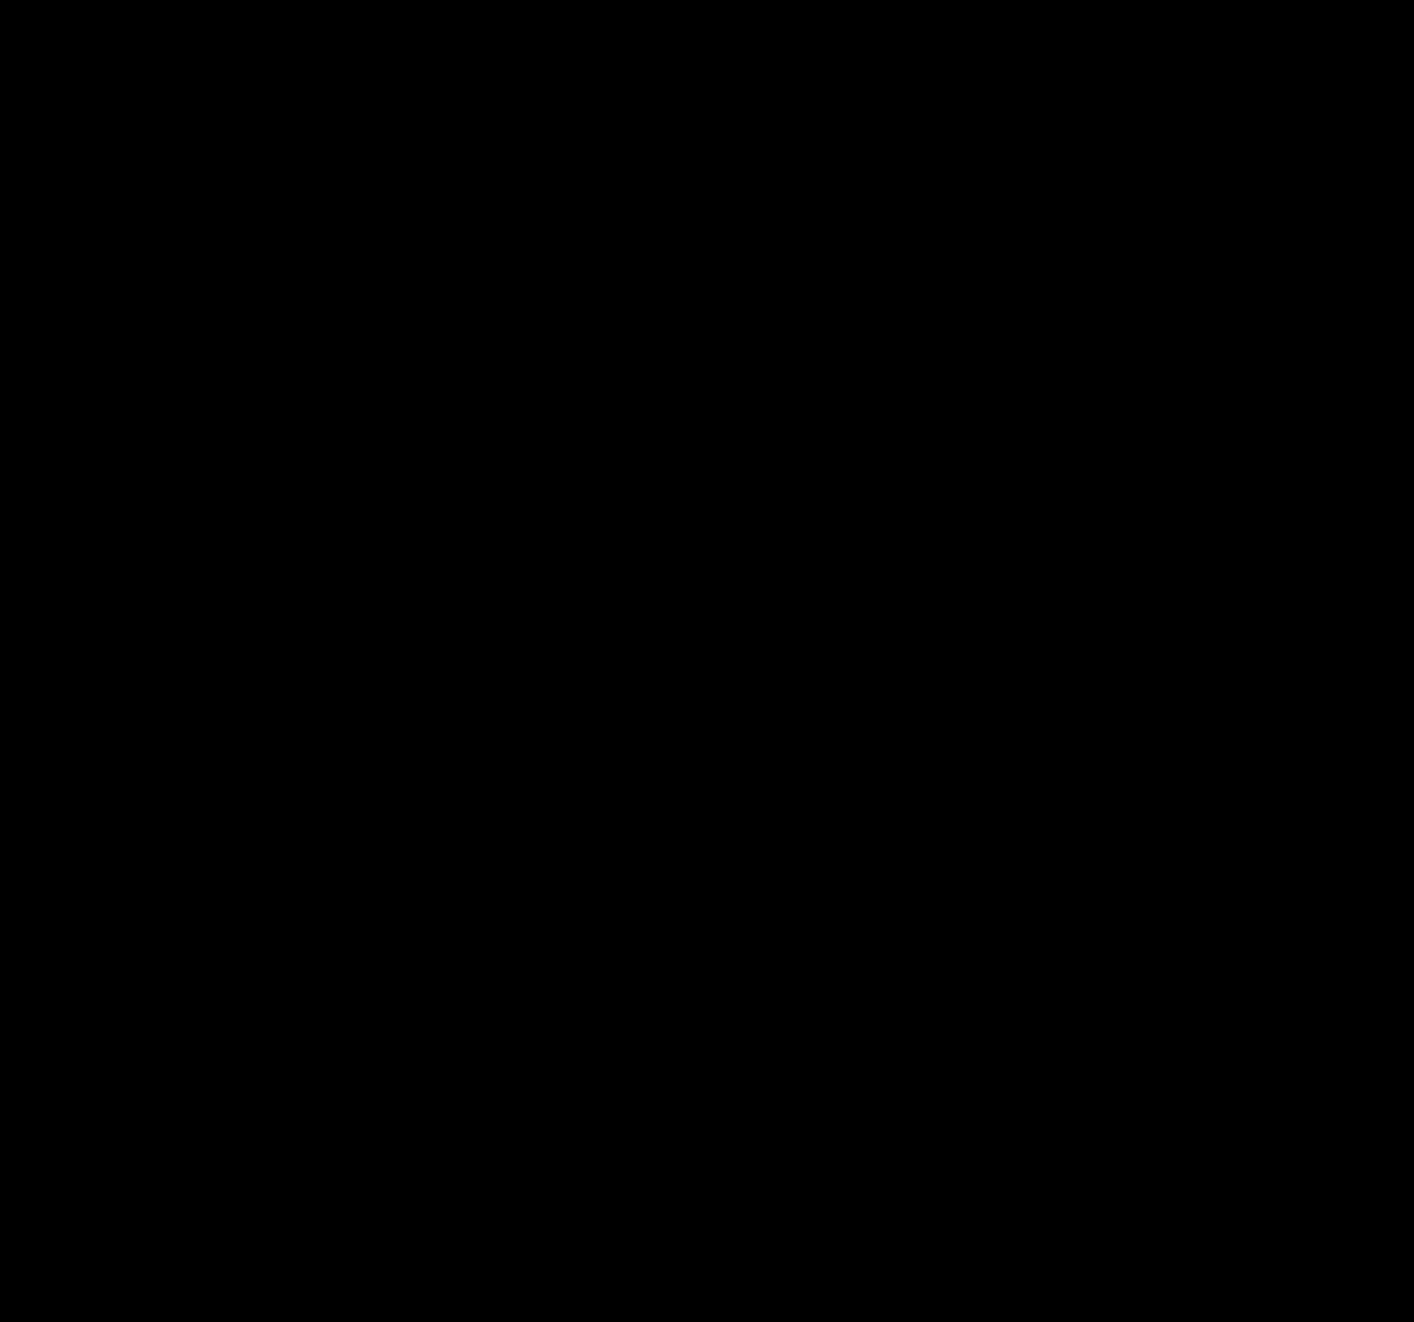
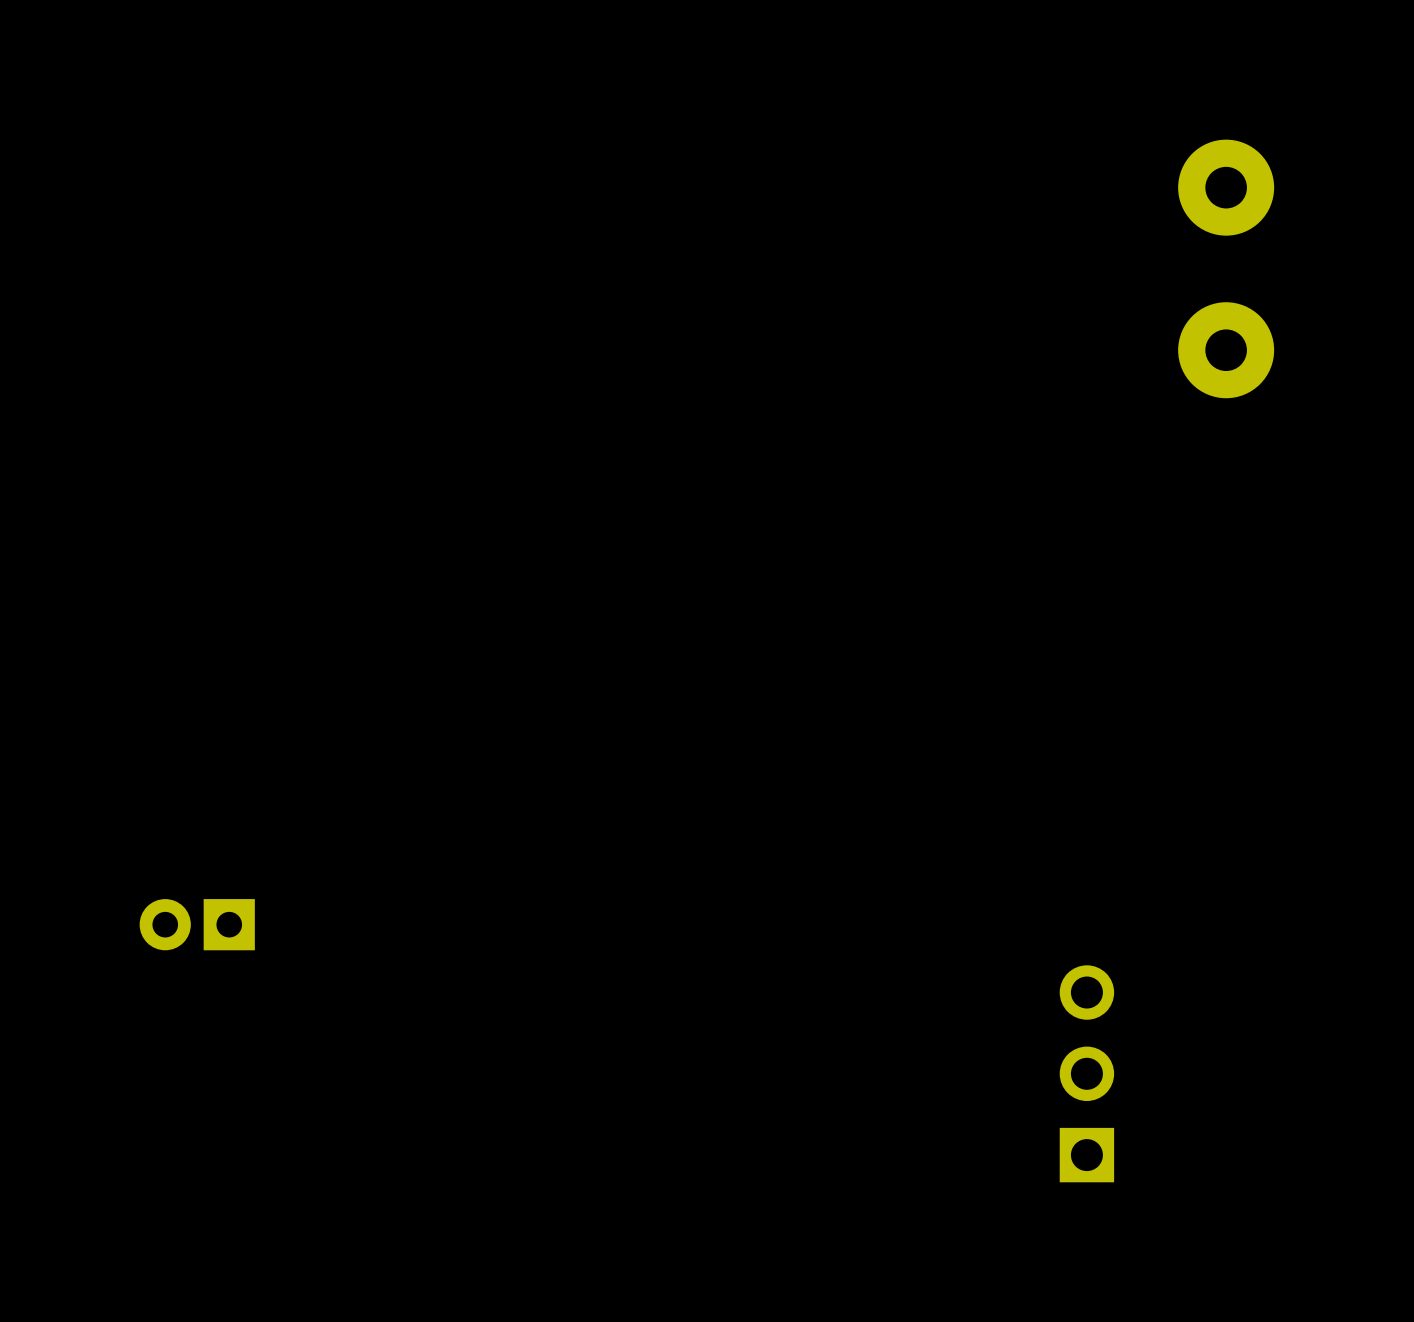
part: none -> (1226, 268)
part: none -> (197, 924)
part: none -> (1086, 1073)

